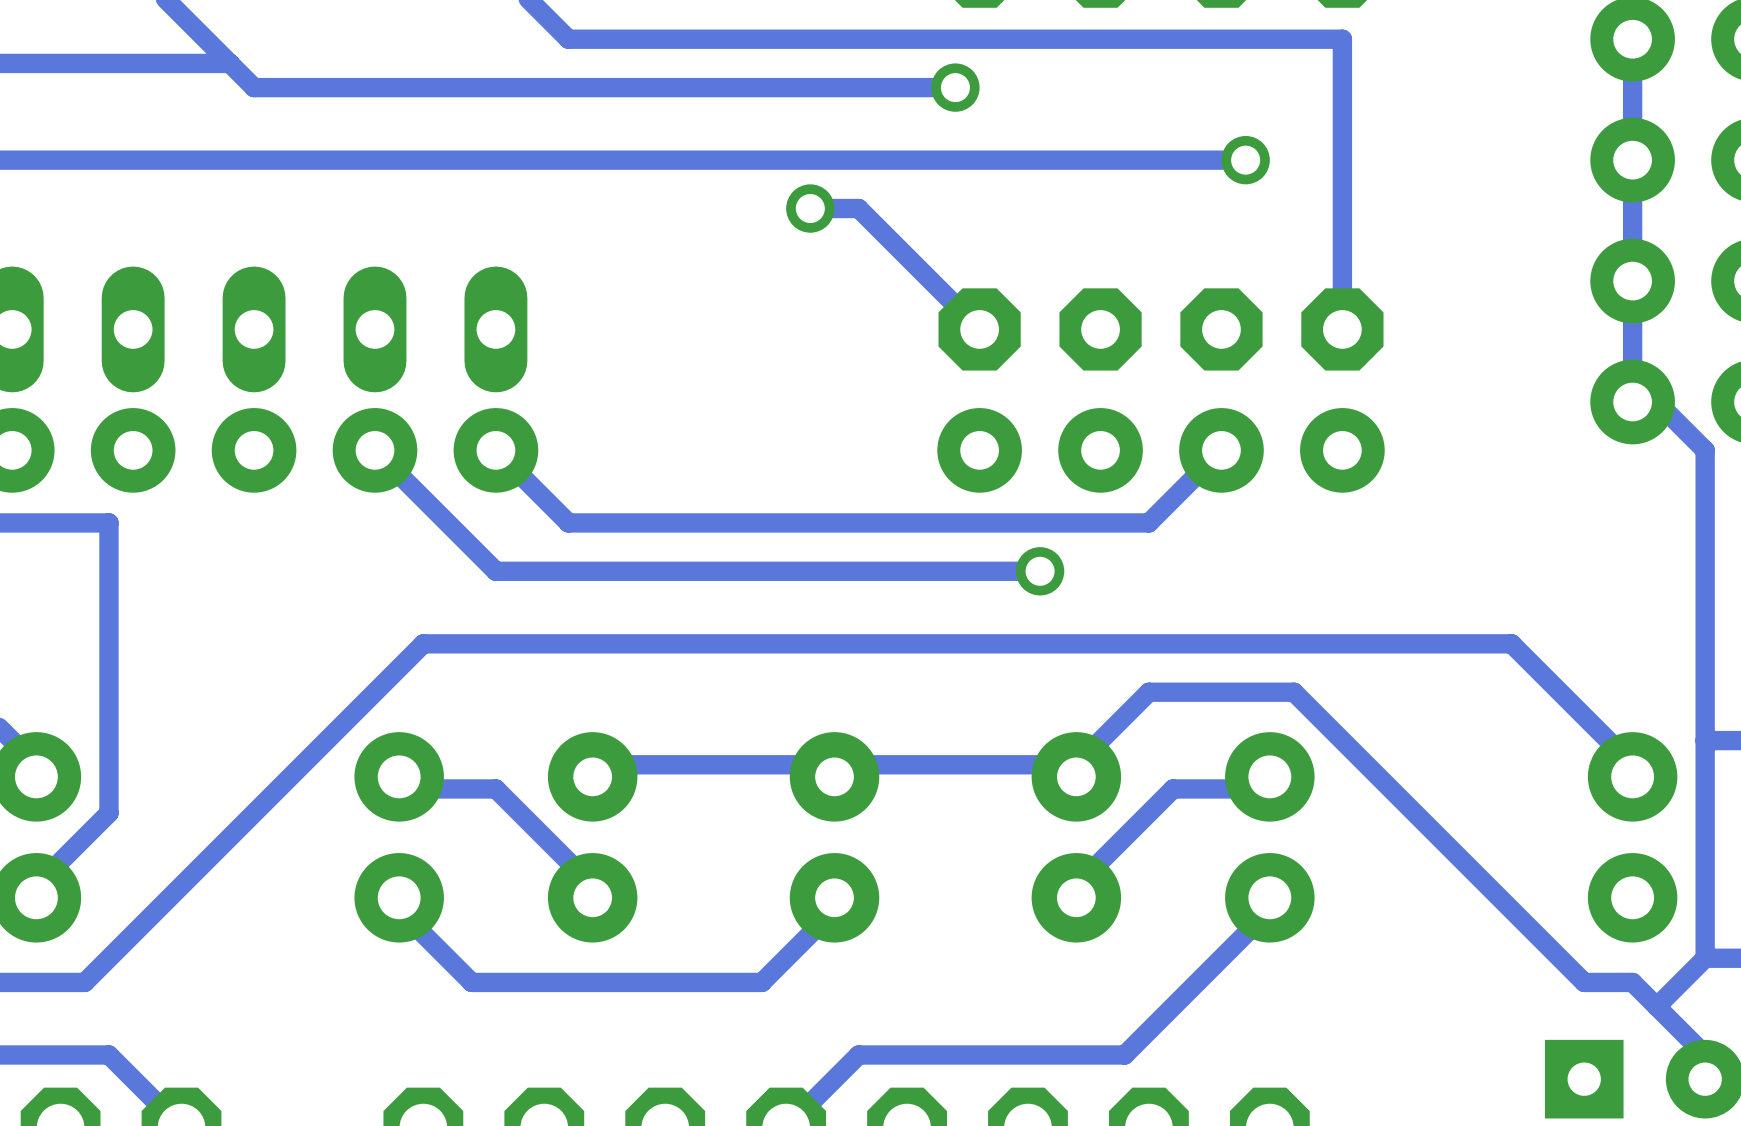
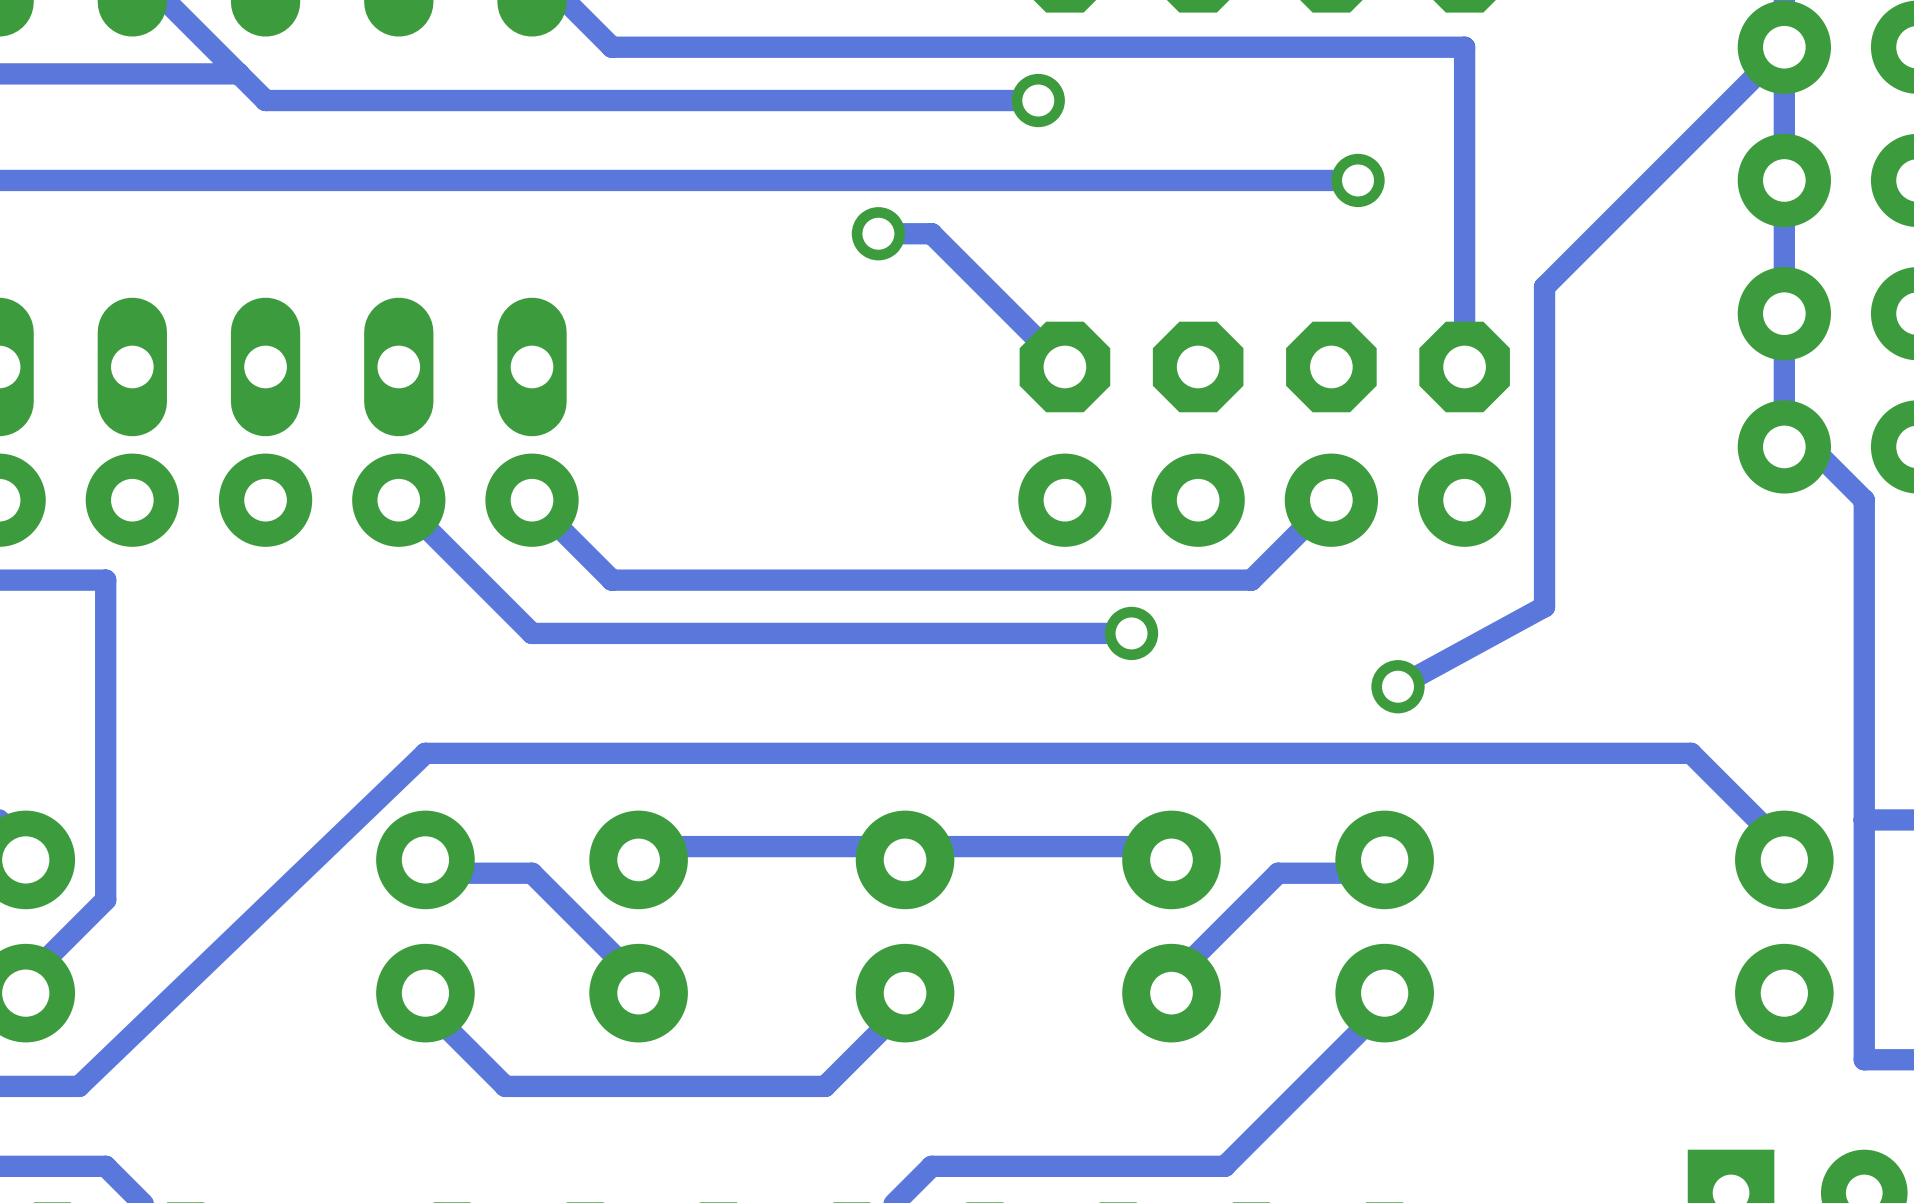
track: none -> (1784, 47) (1544, 287) (1544, 606) (1397, 686)
via: none -> (1397, 686)
track: (1547, 680) (1511, 643) (423, 643) (84, 982) -> (1691, 753) (425, 753) (79, 1086)
track: (1076, 764) (1148, 692) (1294, 692) (1584, 982) (1632, 982) (1705, 1054) -> none
track: (1705, 958) (1656, 1006) -> none

